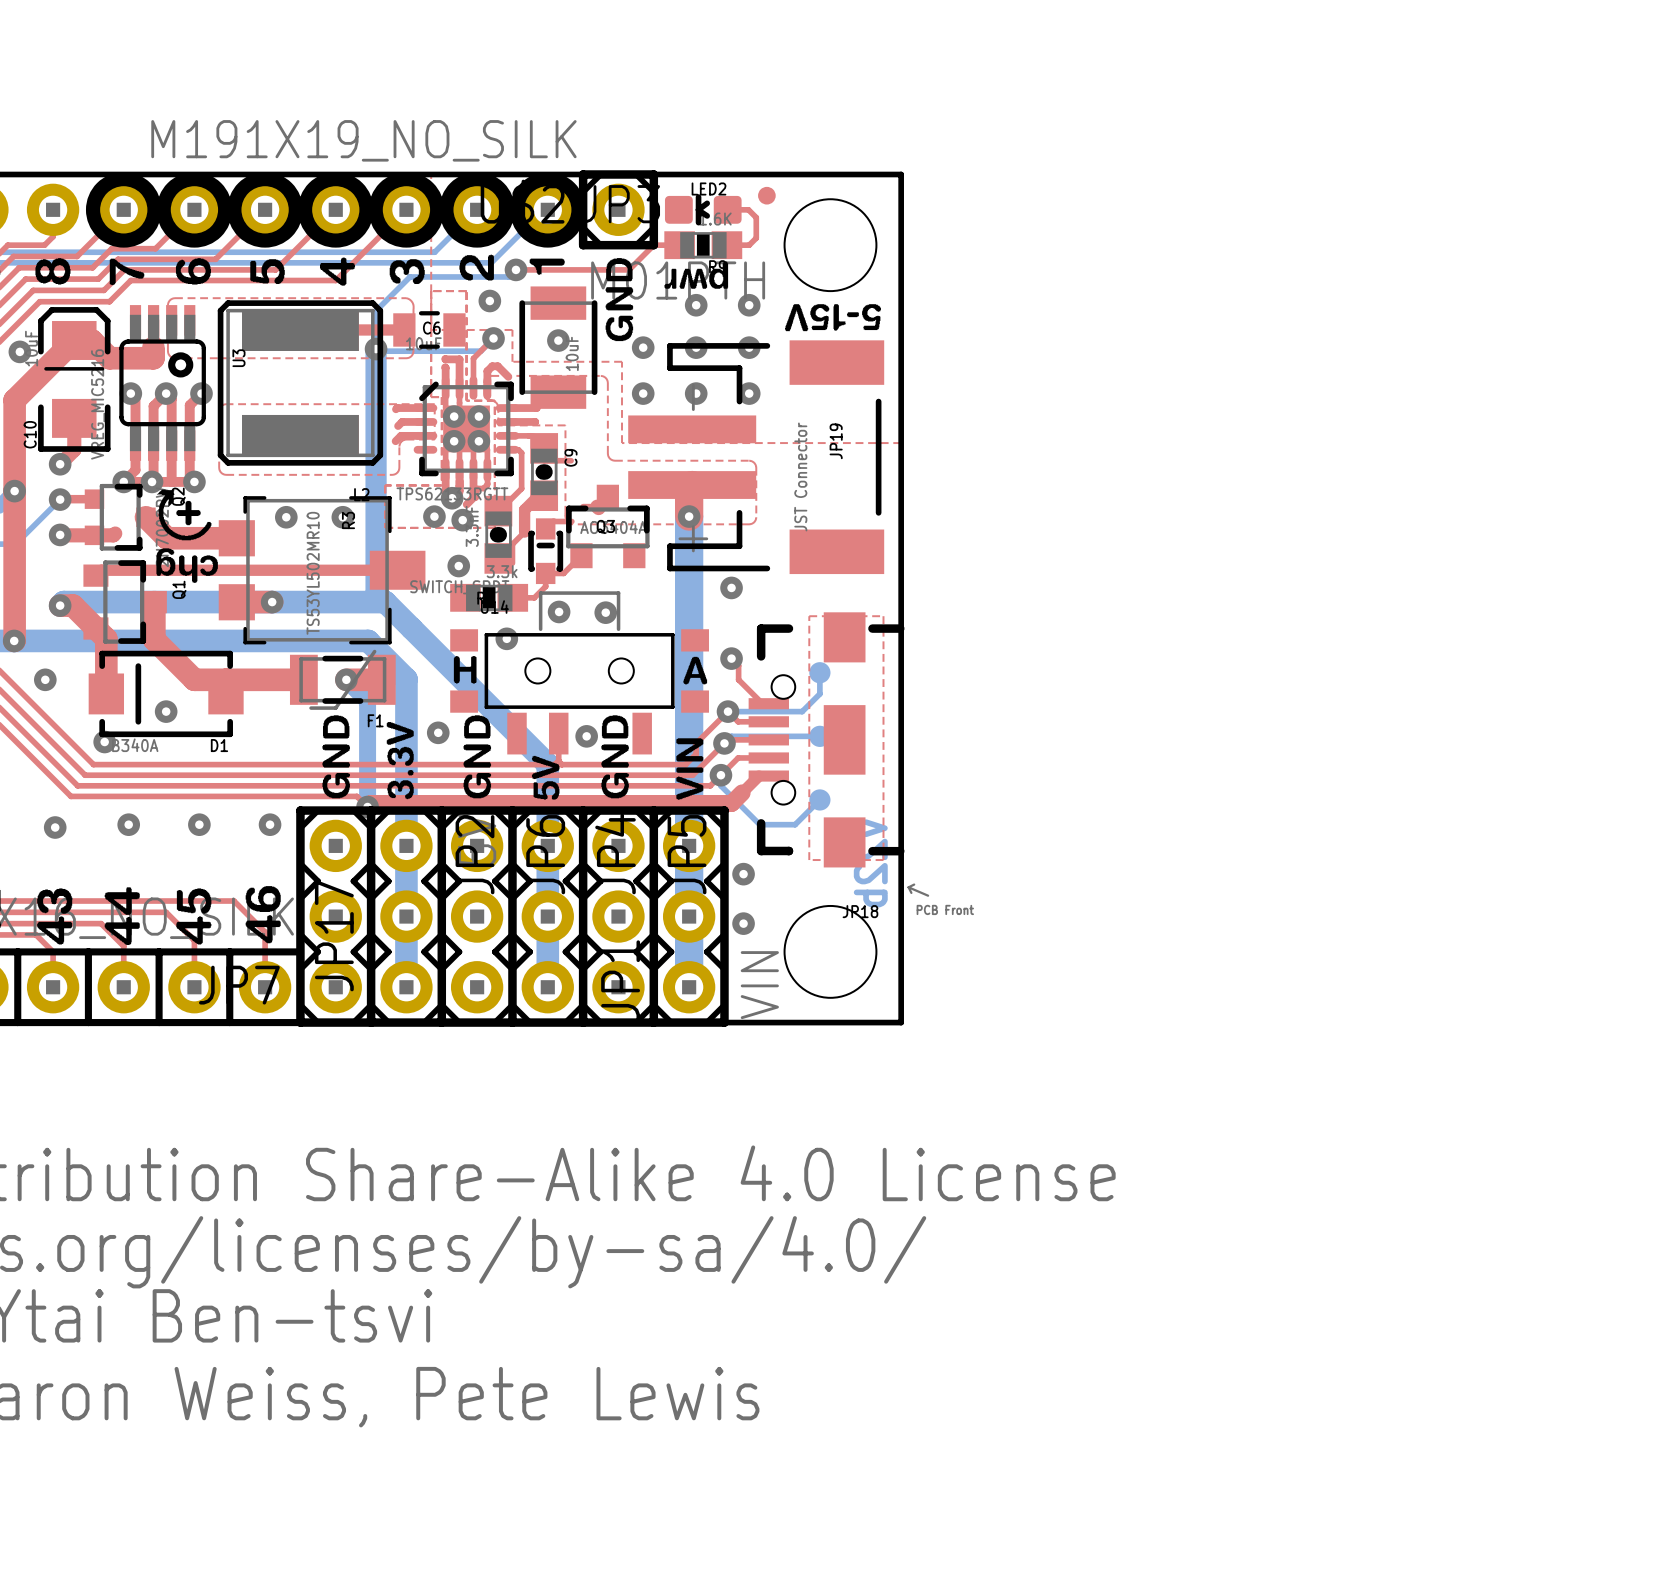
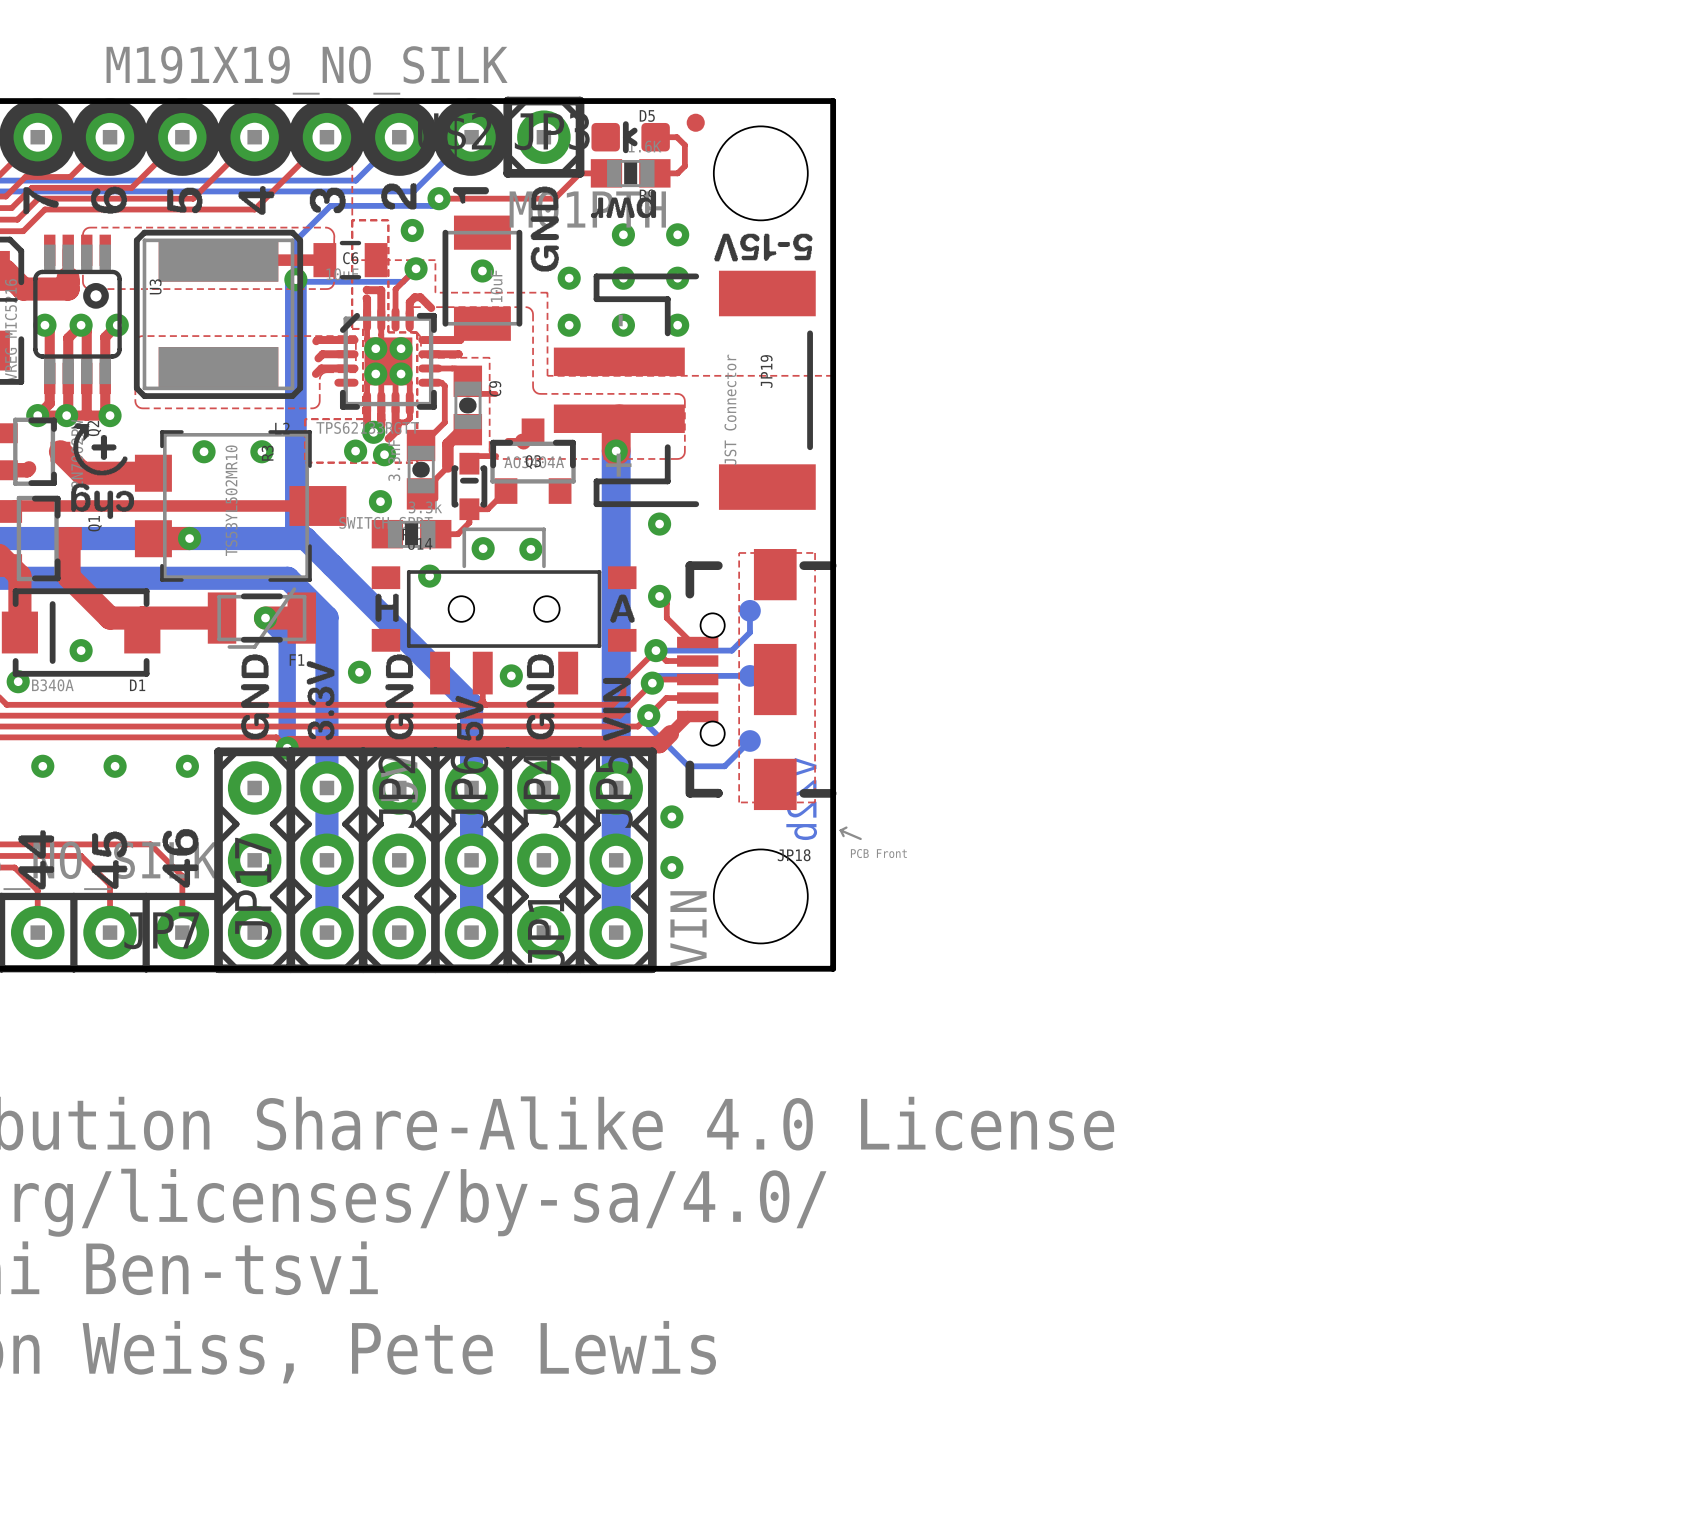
LED2 name: LED2 (709, 188) -> D5 (647, 115)

